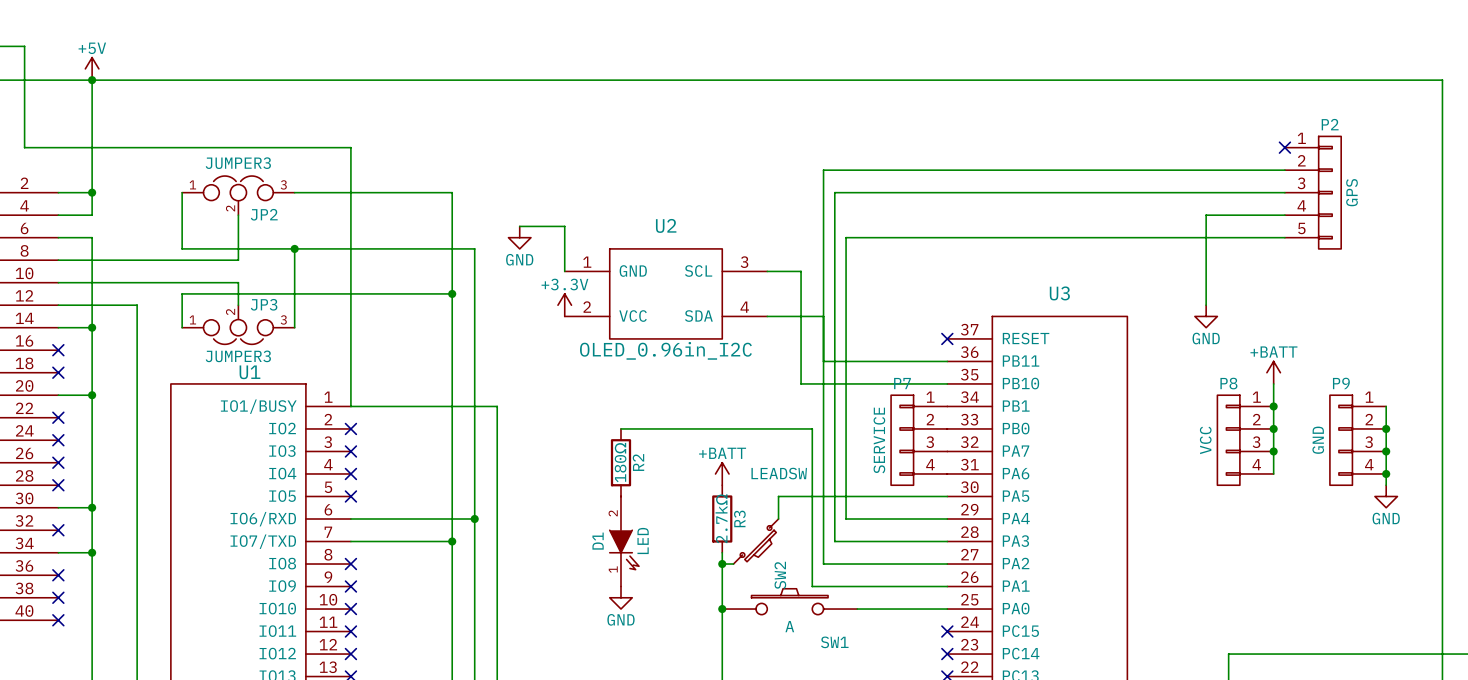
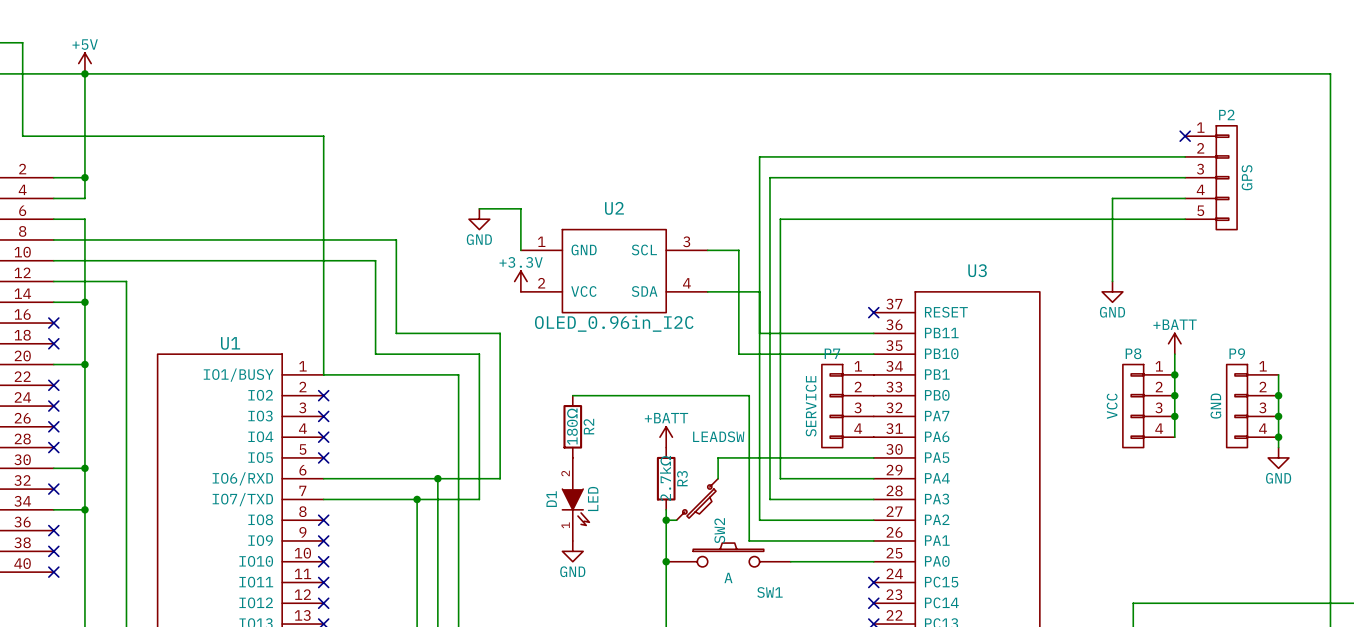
wire: (182, 192) (182, 248) (474, 248) (474, 518) -> (219, 239) (396, 239) (396, 333) (500, 333) (500, 478) (437, 478)
wire: (294, 192) (452, 192) (452, 541) -> (219, 260) (375, 260) (375, 354) (479, 354) (479, 499) (417, 499)
JP2: JUMPER3 (238, 195) -> none
wire: (238, 215) (238, 260) -> none
wire: (294, 248) (294, 327) -> none
junction: (294, 248) -> none
wire: (238, 282) (238, 305) -> none
wire: (452, 293) (182, 293) (182, 327) -> none
junction: (452, 293) -> none
JP3: JUMPER3 (238, 324) -> none

